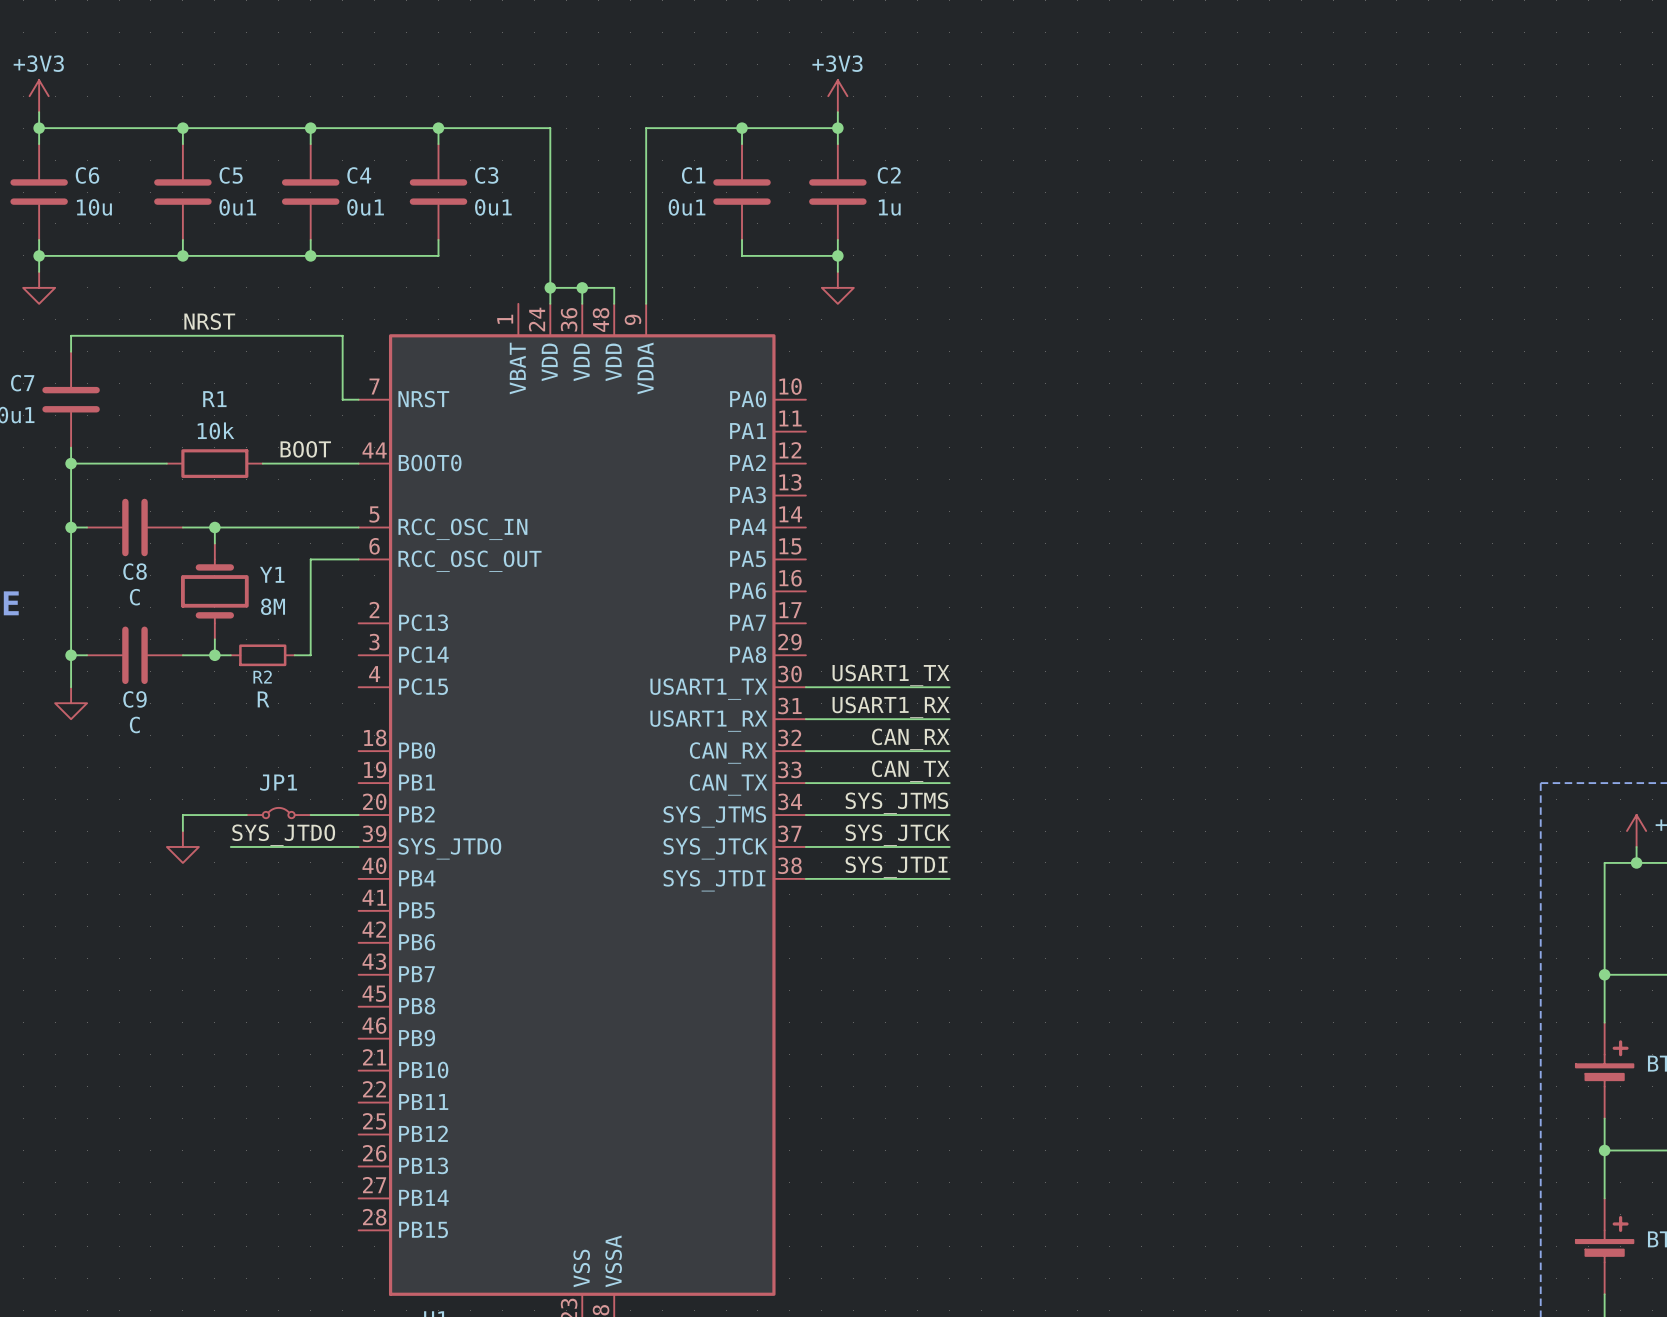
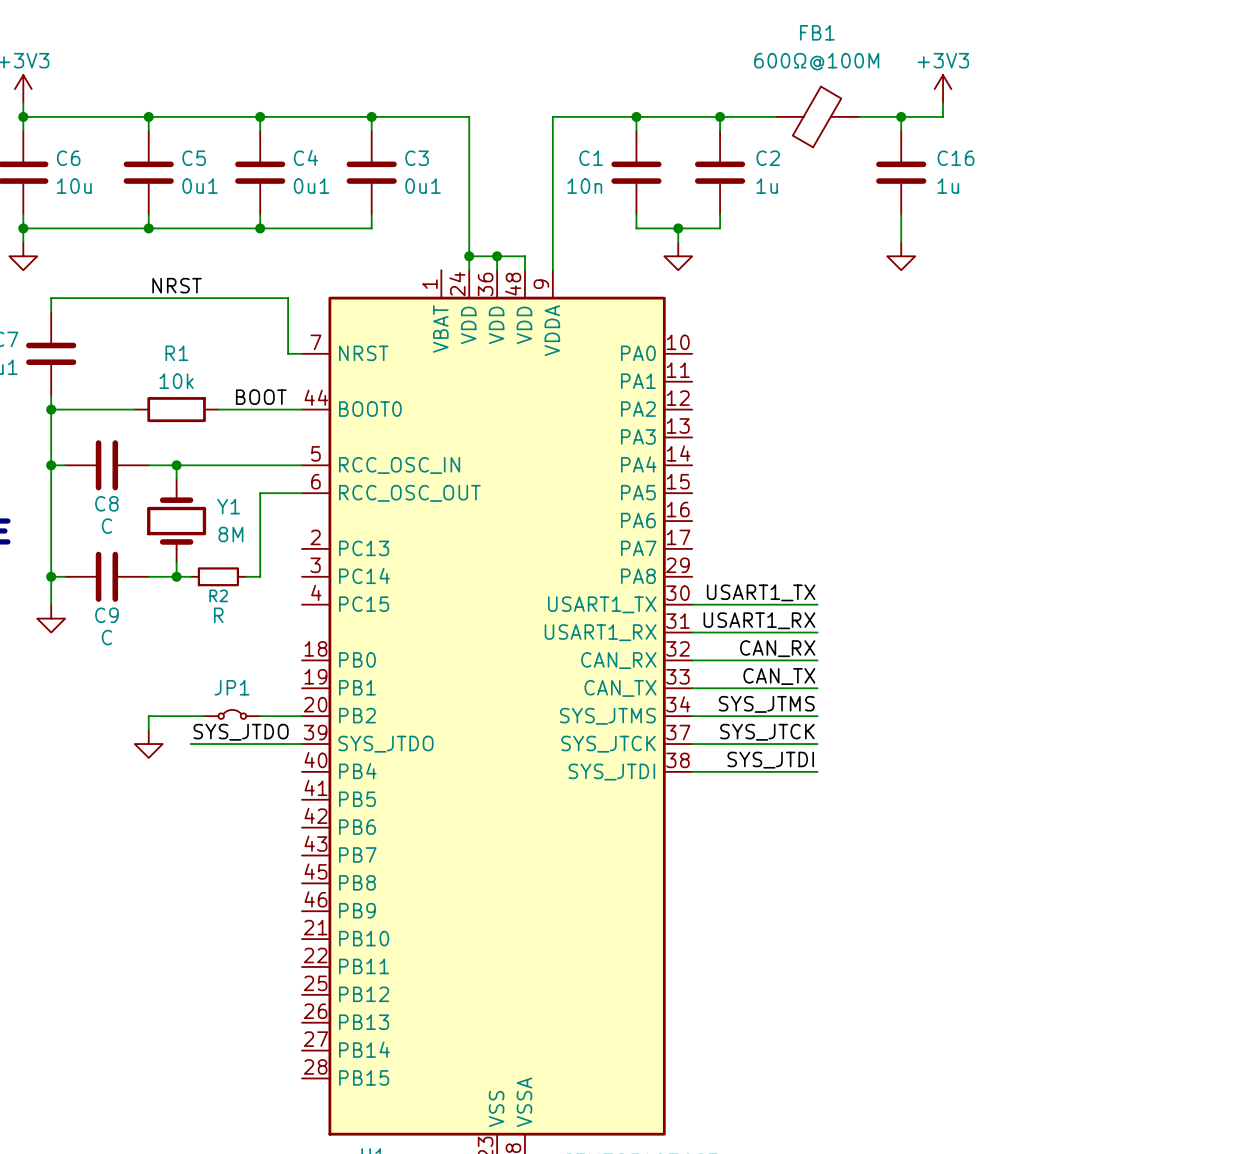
power symbol position: +3V3 (837, 96) -> +3V3 (943, 89)
wire: (837, 112) (837, 128) -> (775, 116) (720, 116)
wire: none -> (943, 103) (943, 116) (859, 116)
FB1: none -> 600Ω@100M (817, 116)
wire: none -> (901, 116) (901, 130)
junction: none -> (901, 116)
C16: none -> 1u (901, 172)
C1 value: 0u1 (687, 207) -> 10n (584, 186)
wire: none -> (901, 214) (901, 242)
wire: (837, 255) (837, 271) -> (678, 228) (678, 242)
junction position: (837, 255) -> (678, 228)
power symbol position: (837, 287) -> (678, 256)
power symbol: none -> (901, 256)

